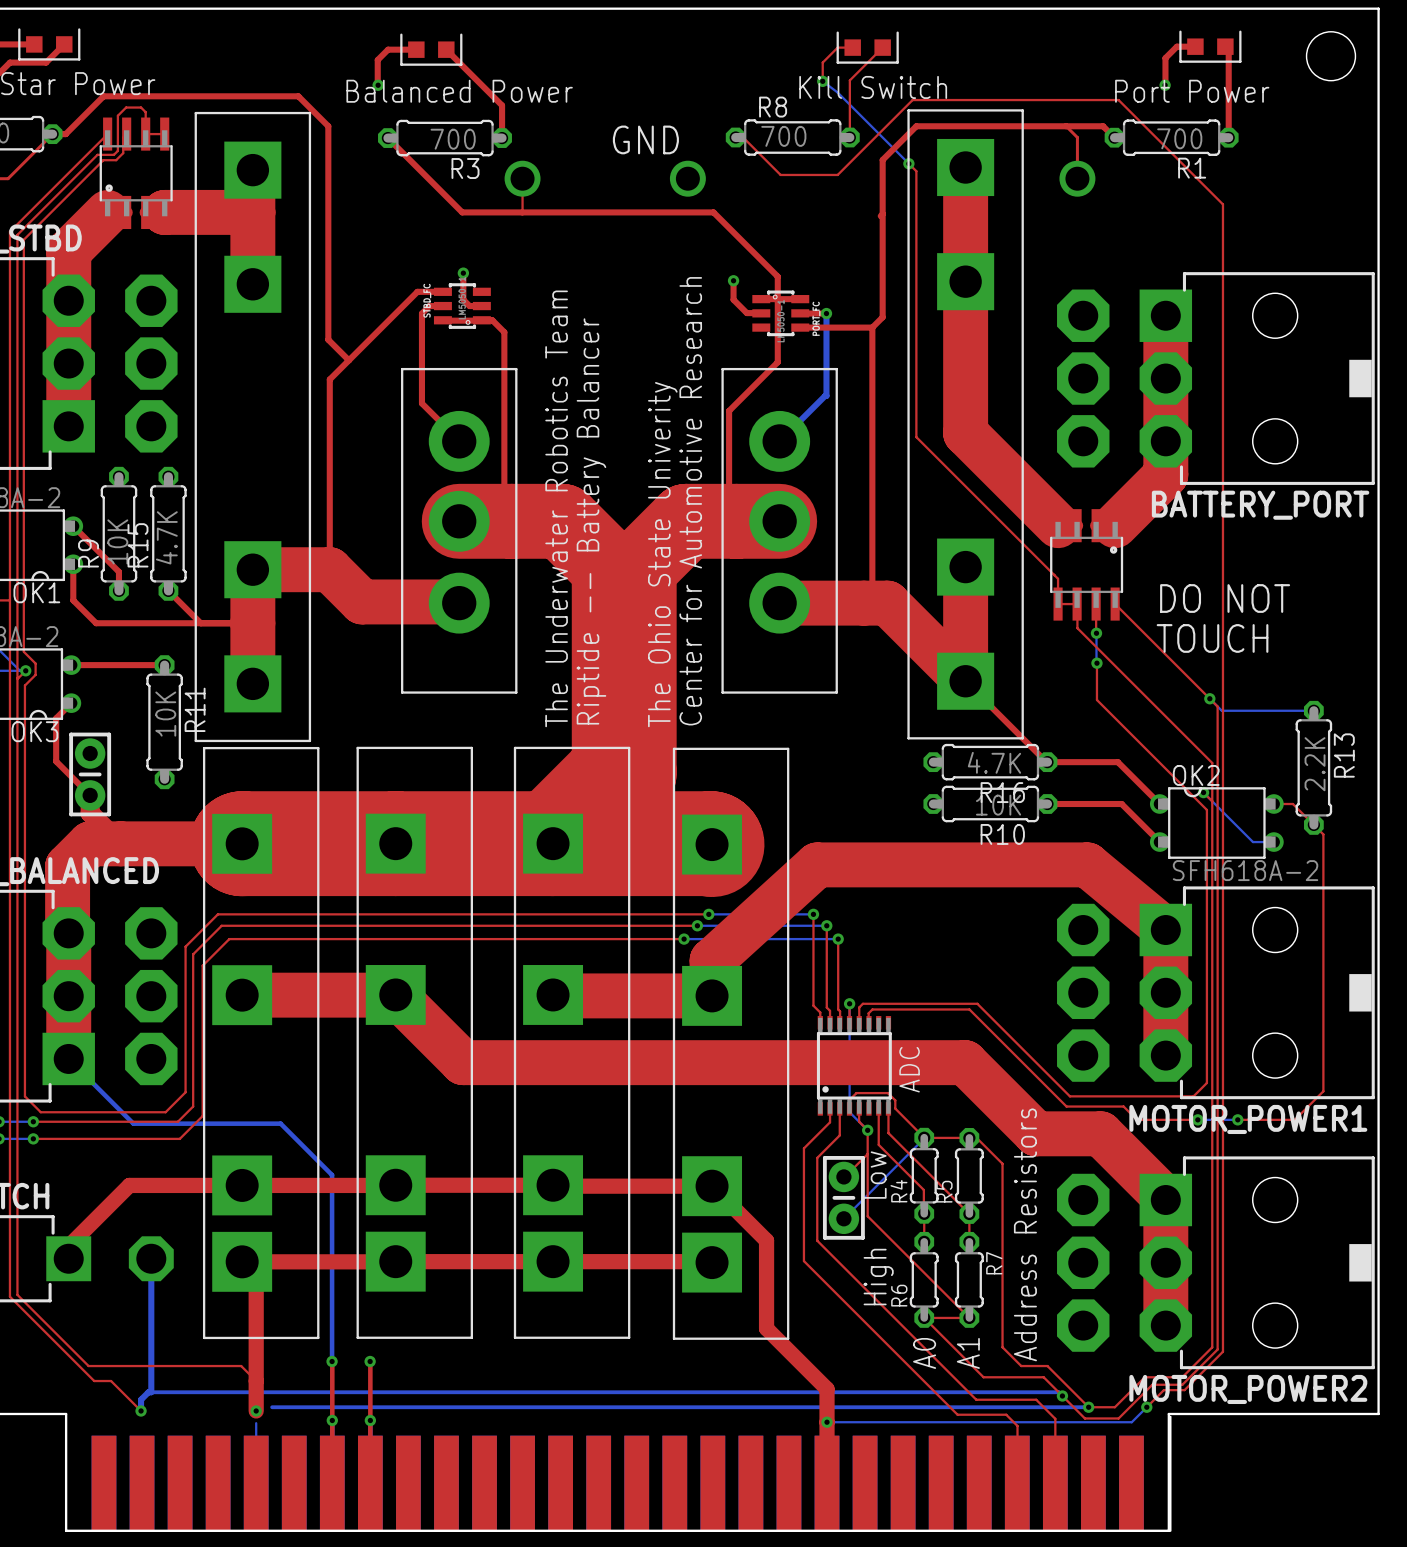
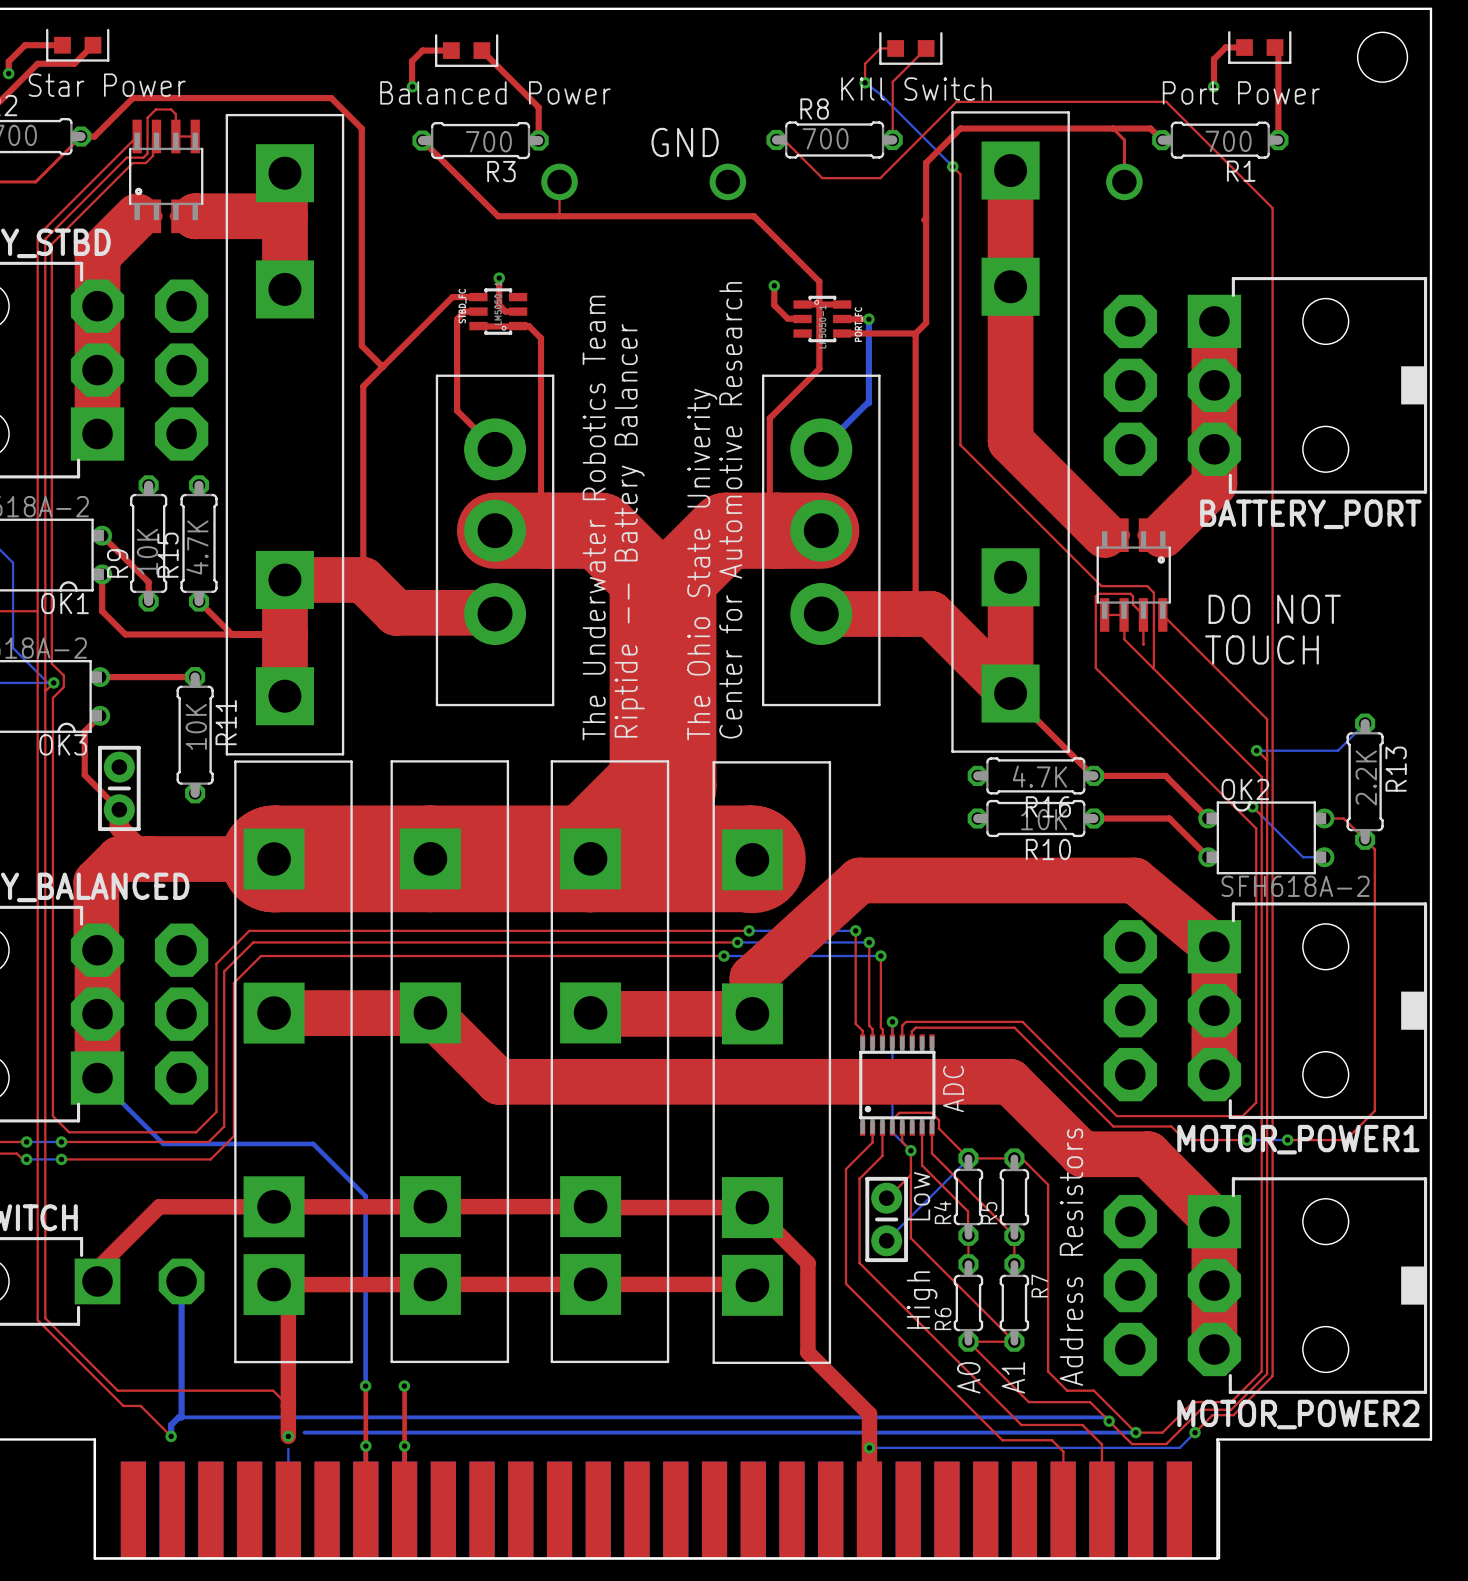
top track: (1054, 575) (1058, 578) (1058, 604) -> (1101, 586) (1147, 586) (1153, 592) (1153, 668)
bottom track: (1096, 633) (1096, 663) -> none
via: (1096, 633) -> none
top track: (1096, 663) (1096, 700) (1206, 809) (1206, 813) -> (1143, 614) (1133, 604) (1133, 596) (1130, 593) (1098, 593) (1095, 596) (1095, 668) (1256, 828)
via: (1096, 663) -> none
bottom track: (1209, 698) (1221, 710) (1313, 710) -> (1256, 750) (1338, 750) (1365, 723)
via position: (1209, 698) -> (1256, 750)
top track: none -> (1256, 750) (1267, 760)

